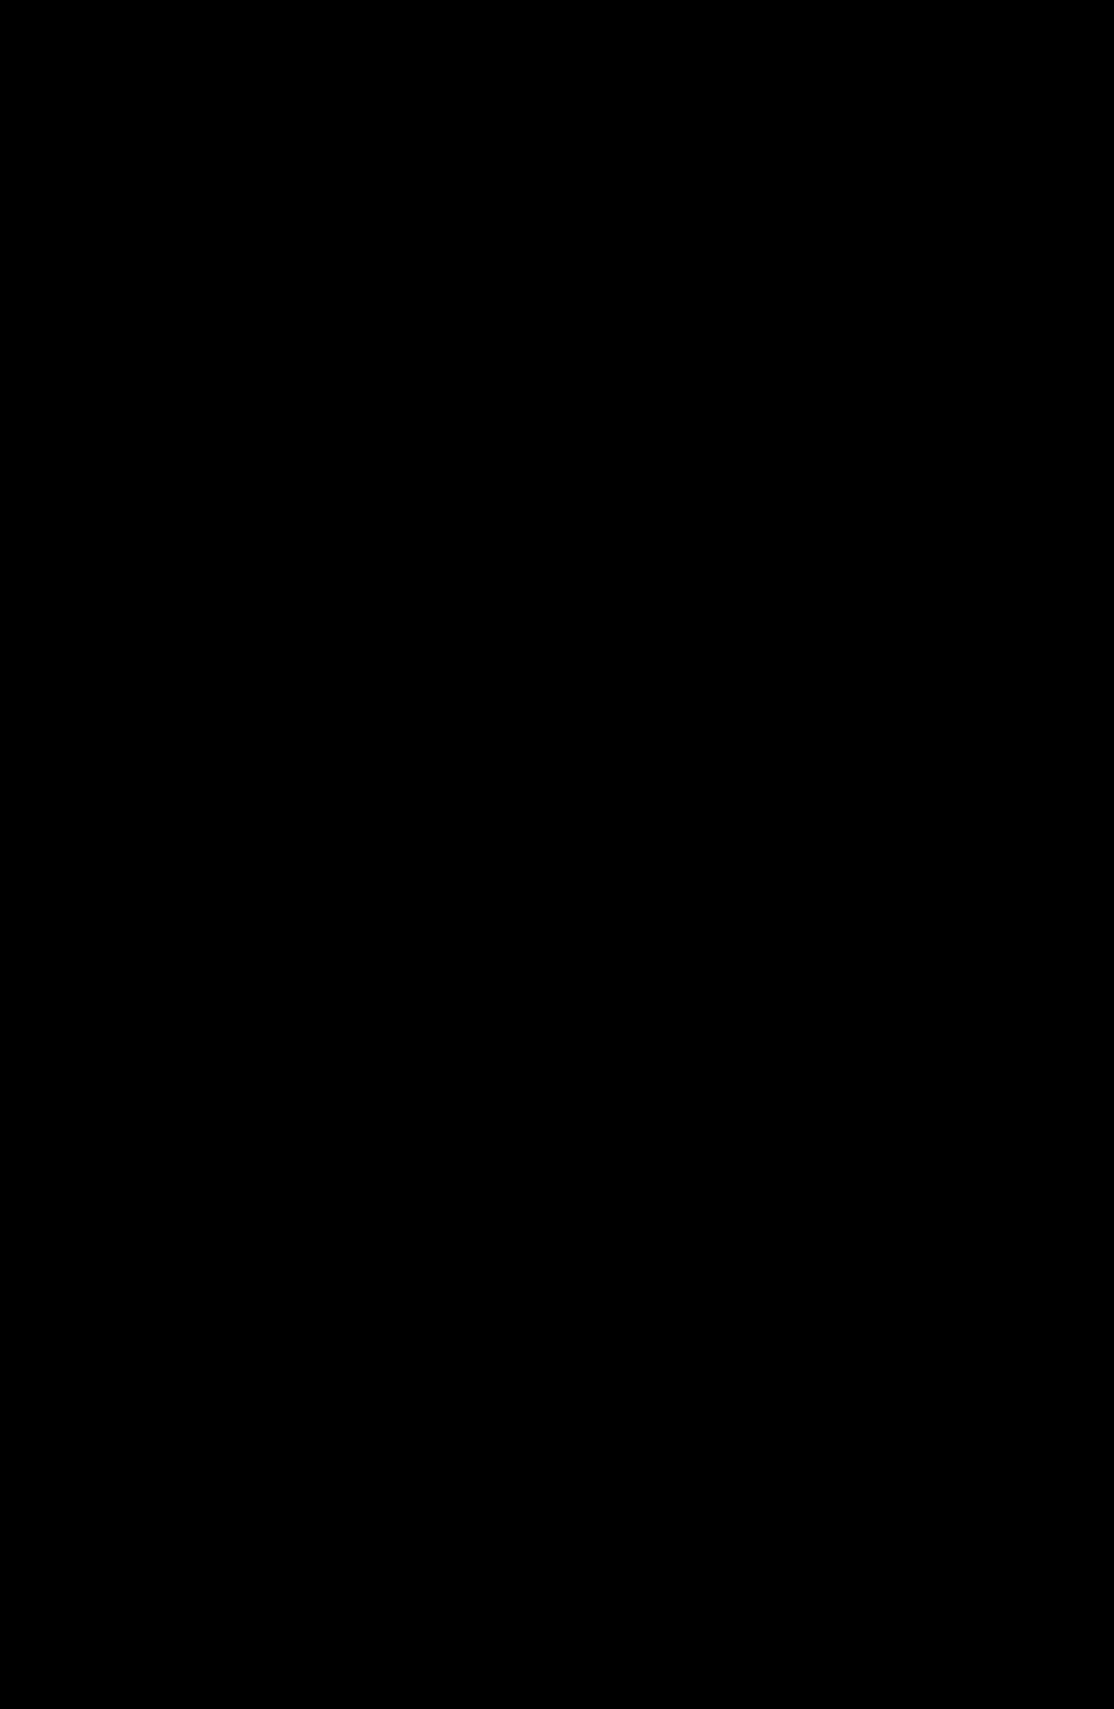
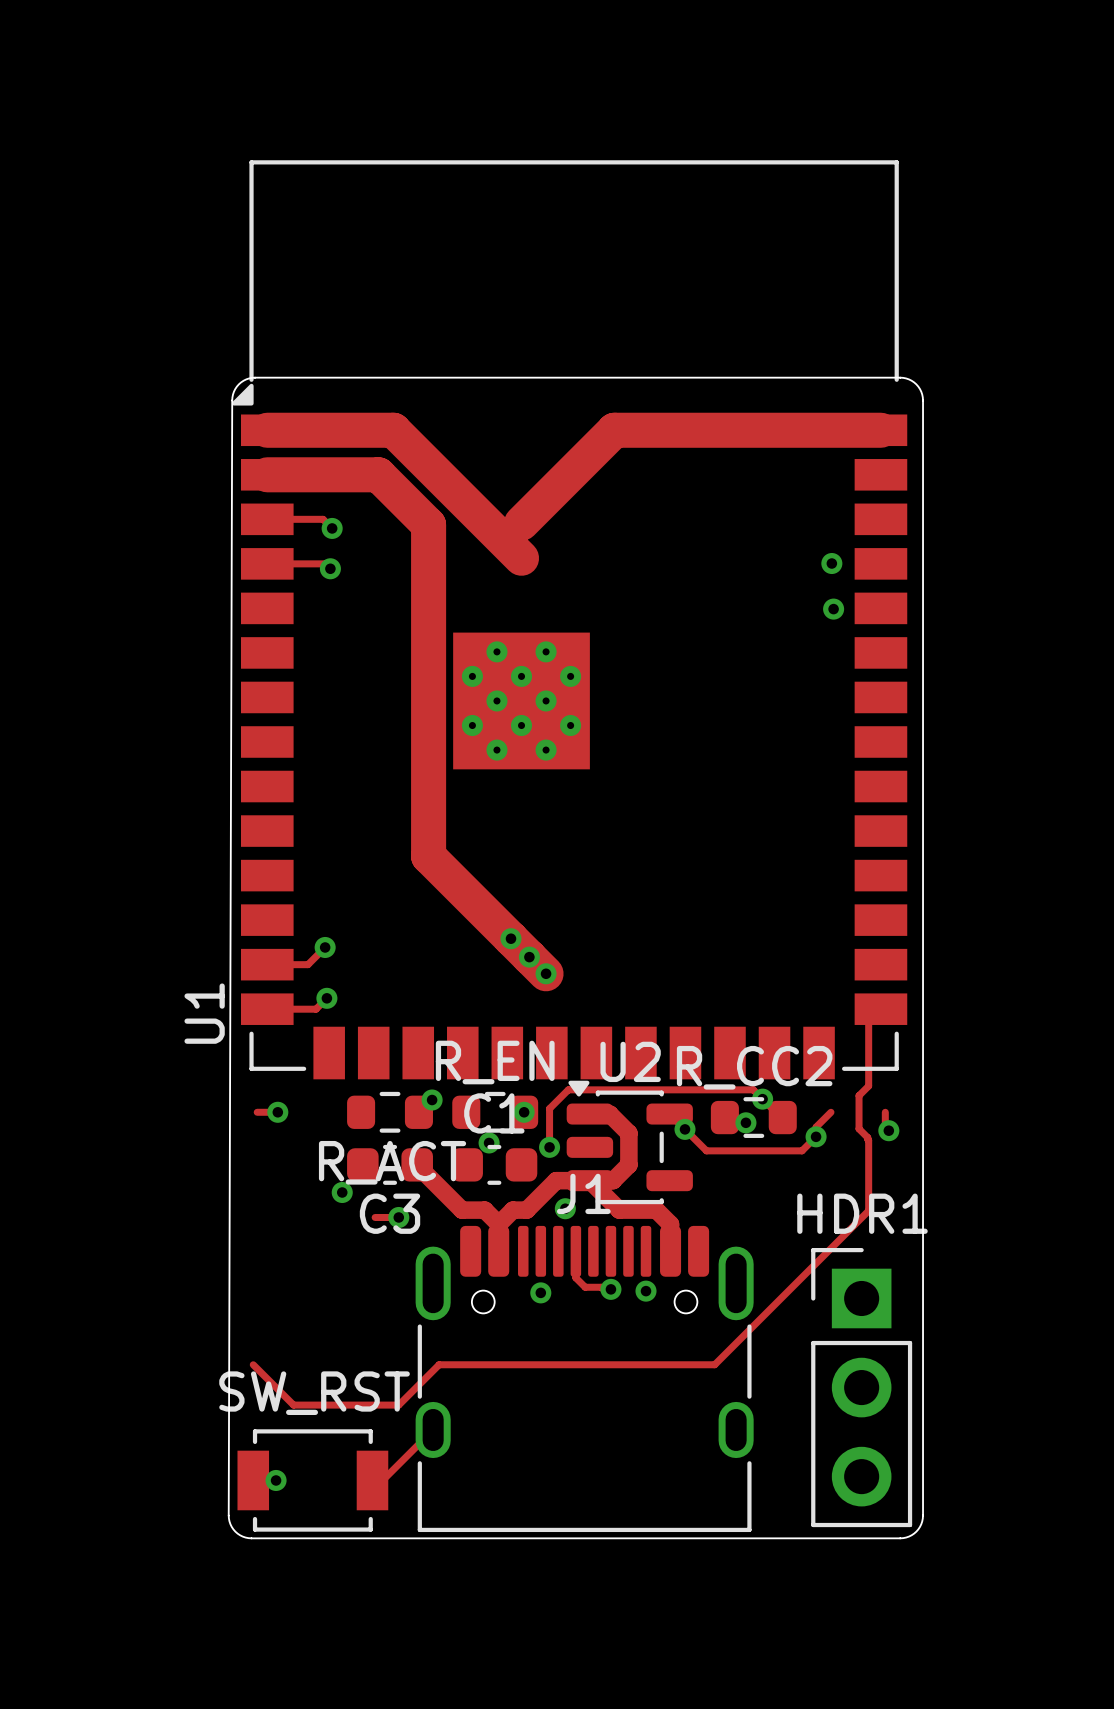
board edge: none -> (255, 377) (900, 377) (911, 380) (919, 389) (923, 400) (923, 1515) (919, 1526) (911, 1535) (900, 1538) (251, 1538) (240, 1535) (231, 1526) (228, 1515) (232, 400) (233, 391) (238, 384) (246, 379) (255, 377)
track: none -> (267, 430) (393, 430) (521, 558)
track: none -> (880, 430) (614, 430) (521, 523)
track: none -> (267, 474) (378, 474) (428, 524) (428, 856) (546, 973)
track: none -> (267, 519) (323, 519) (332, 528)
via: none -> (332, 528)
track: none -> (267, 563) (325, 563) (330, 568)
via: none -> (831, 563)
via: none -> (330, 568)
via: none -> (833, 609)
U1: none -> (569, 619)
via: none -> (511, 938)
track: none -> (325, 947) (307, 964) (267, 964)
via: none -> (325, 947)
via: none -> (529, 957)
via: none -> (546, 973)
track: none -> (326, 998) (316, 1009) (267, 1009)
via: none -> (326, 998)
track: none -> (880, 1009) (868, 1021) (868, 1086) (859, 1095) (859, 1128) (868, 1140) (868, 1210) (714, 1364) (439, 1364) (398, 1405) (293, 1405) (253, 1364)
via: none -> (762, 1099)
via: none -> (432, 1100)
track: none -> (664, 1109) (706, 1150) (802, 1150) (816, 1136) (816, 1127) (830, 1112)
track: none -> (257, 1112) (277, 1112)
via: none -> (277, 1112)
R_ACT: none -> (390, 1112)
R_EN: none -> (495, 1112)
via: none -> (524, 1112)
track: none -> (782, 1112) (775, 1112) (753, 1089) (568, 1089) (549, 1108) (549, 1147)
track: none -> (885, 1112) (885, 1127) (889, 1131)
track: none -> (589, 1114) (609, 1114) (628, 1133) (628, 1164) (613, 1180) (556, 1180) (526, 1210) (512, 1210) (498, 1224)
R_CC2: none -> (753, 1117)
via: none -> (745, 1122)
via: none -> (685, 1129)
via: none -> (888, 1130)
via: none -> (816, 1136)
via: none -> (489, 1142)
U2: none -> (629, 1142)
via: none -> (549, 1147)
C3: none -> (390, 1164)
C1: none -> (494, 1164)
track: none -> (417, 1165) (462, 1210) (484, 1210) (498, 1224) (498, 1251) (498, 1230)
track: none -> (589, 1180) (619, 1210) (656, 1210) (670, 1224) (670, 1251)
via: none -> (342, 1192)
via: none -> (565, 1208)
track: none -> (375, 1217) (398, 1217)
via: none -> (398, 1217)
track: none -> (575, 1251) (575, 1277) (585, 1287) (610, 1289)
via: none -> (610, 1289)
via: none -> (646, 1291)
via: none -> (540, 1292)
J1: none -> (584, 1378)
HDR1: none -> (861, 1387)
track: none -> (433, 1429) (382, 1480) (372, 1480)
via: none -> (276, 1480)
SW_RST: none -> (312, 1480)

